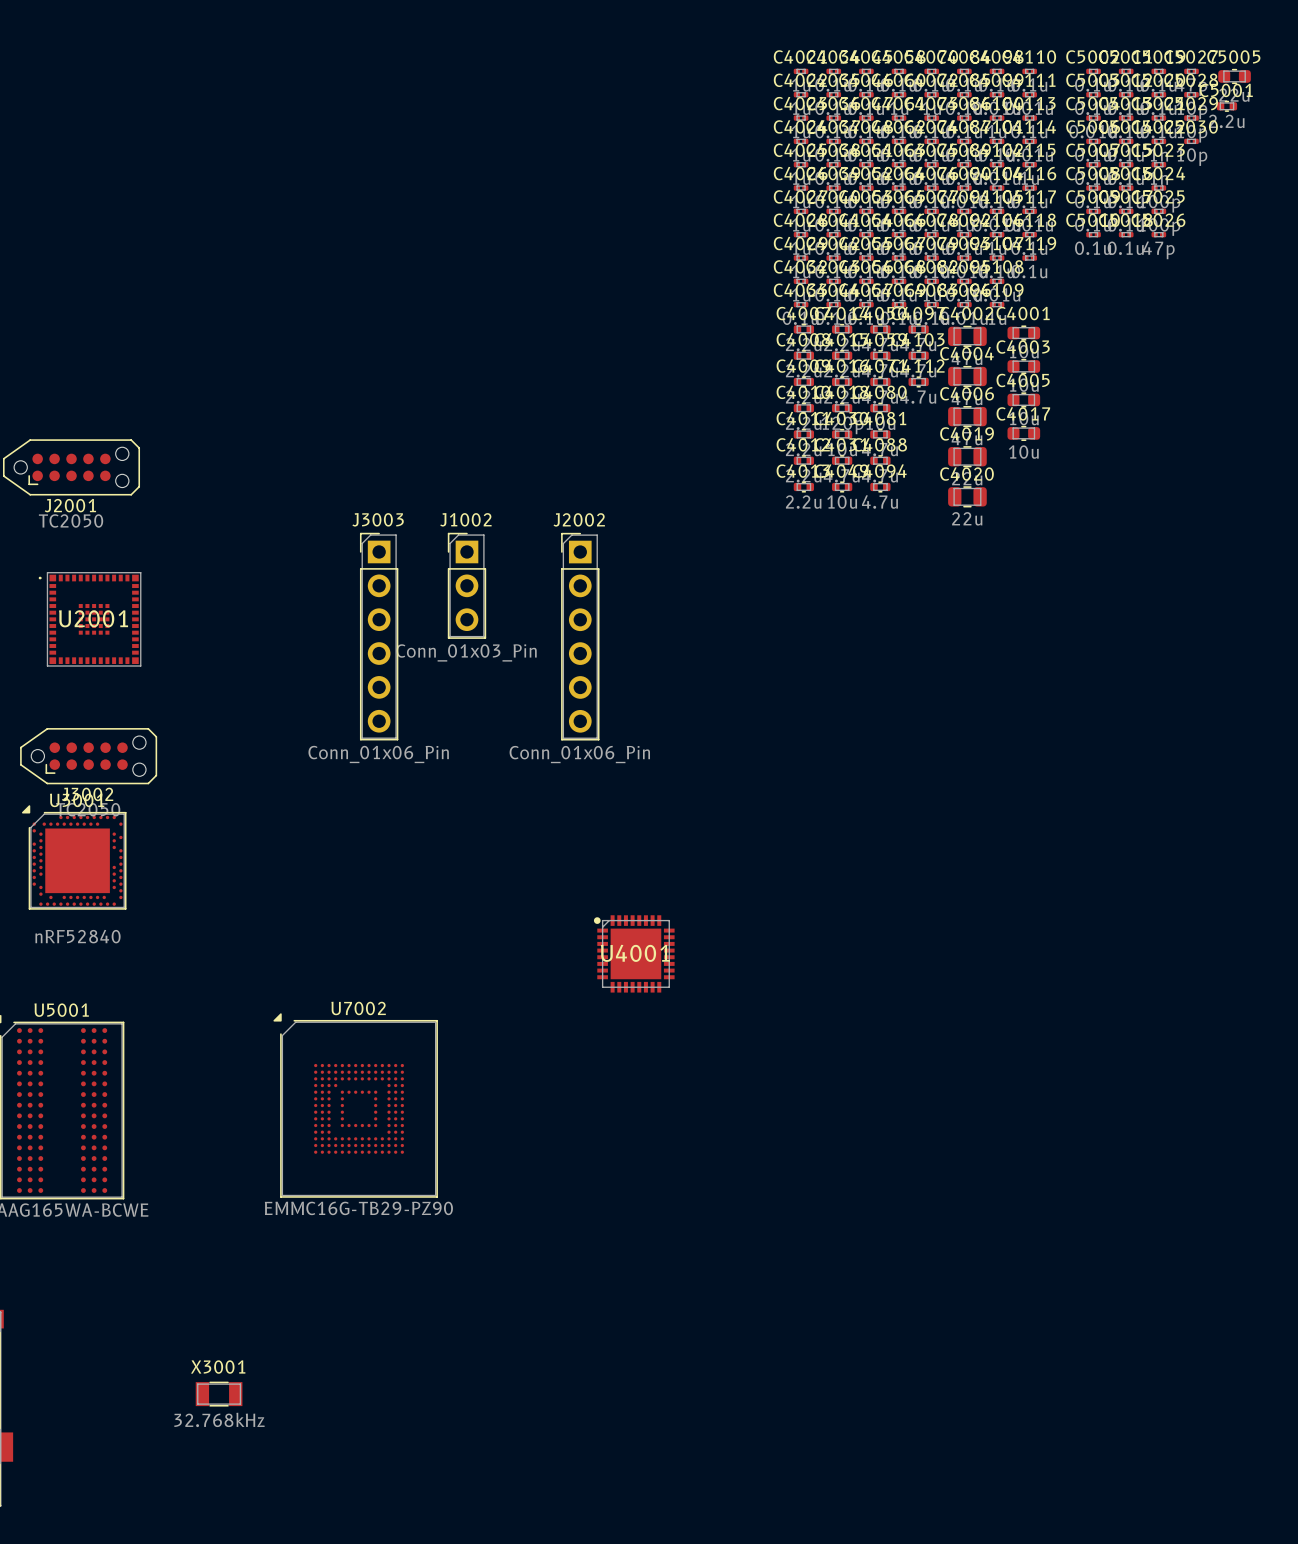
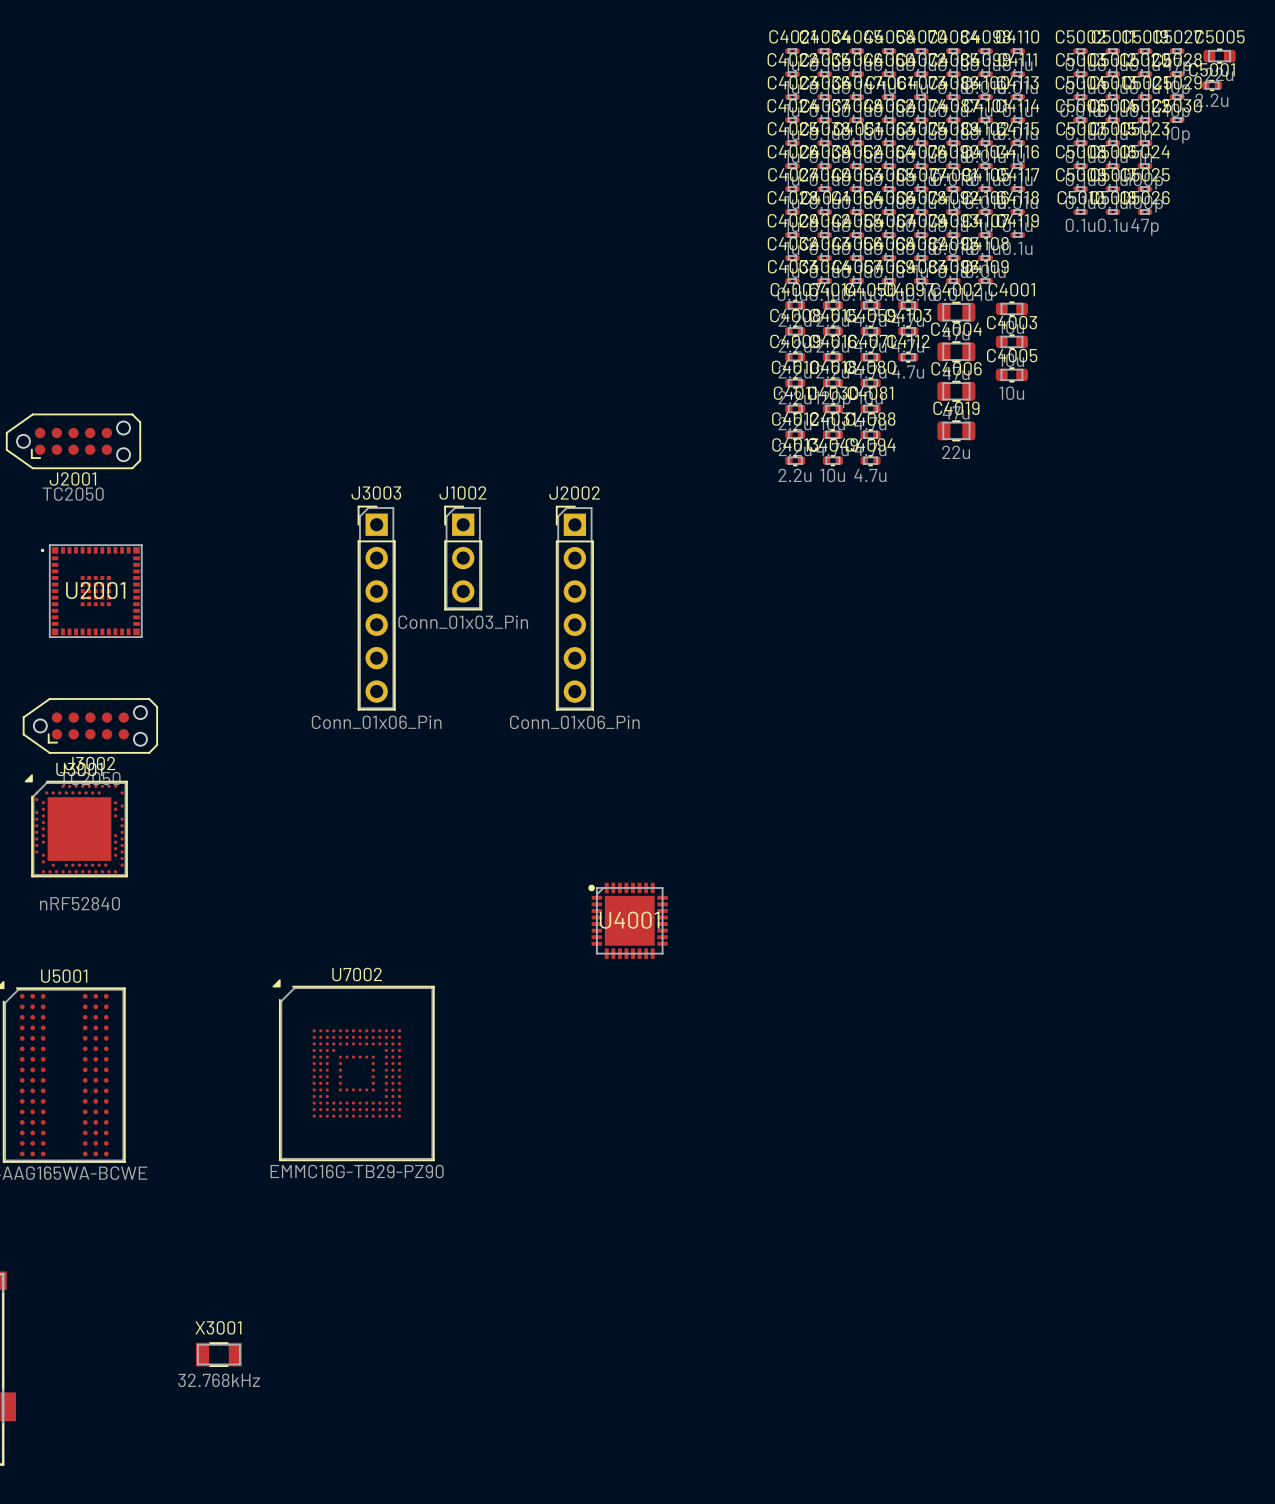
C4017: 10u (1023, 433) -> none
C4020: 22u (967, 496) -> none

